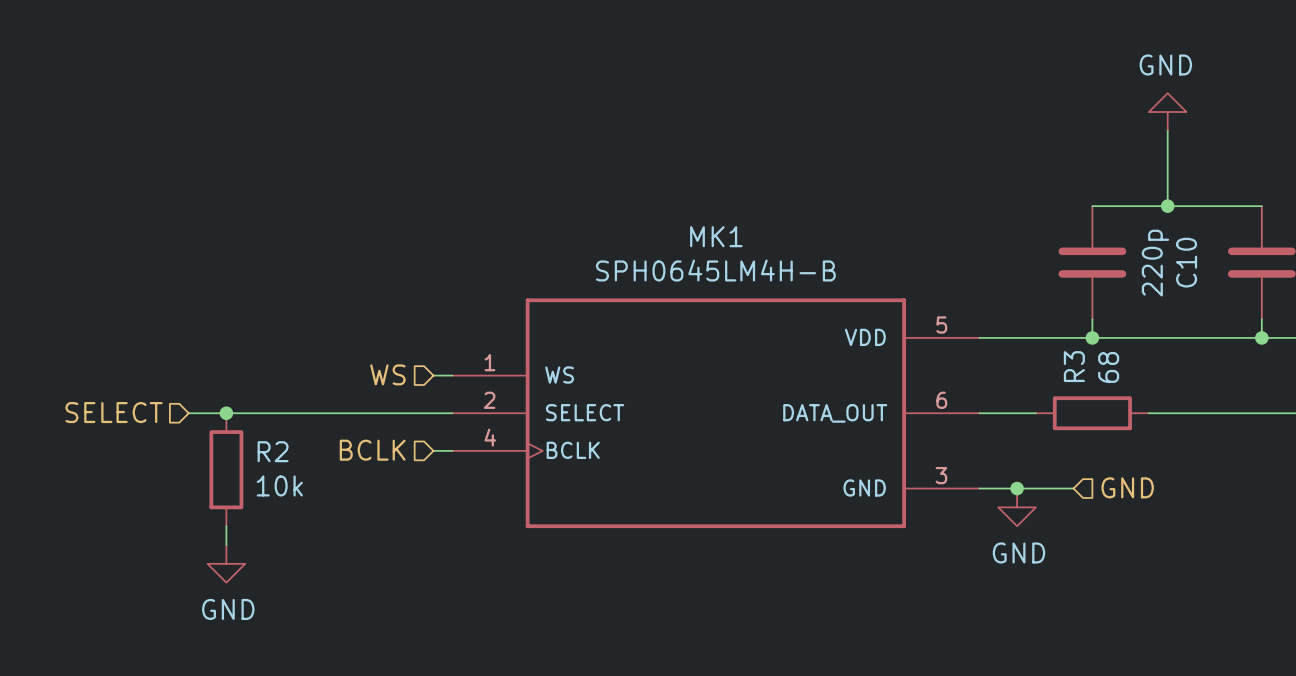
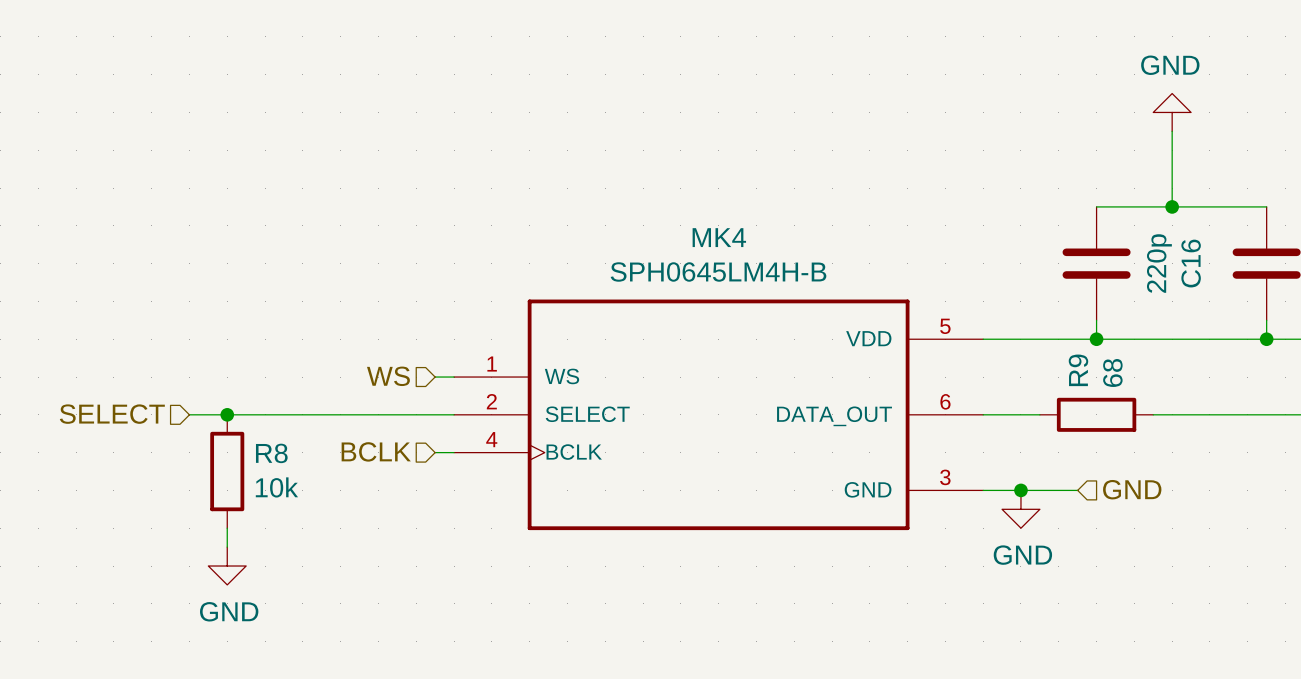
MK1 name: MK1 (716, 236) -> MK4 (719, 237)
C10 name: C10 (1186, 262) -> C16 (1191, 263)
R3 name: R3 (1074, 366) -> R9 (1078, 370)
R2 name: R2 (273, 451) -> R8 (271, 453)

